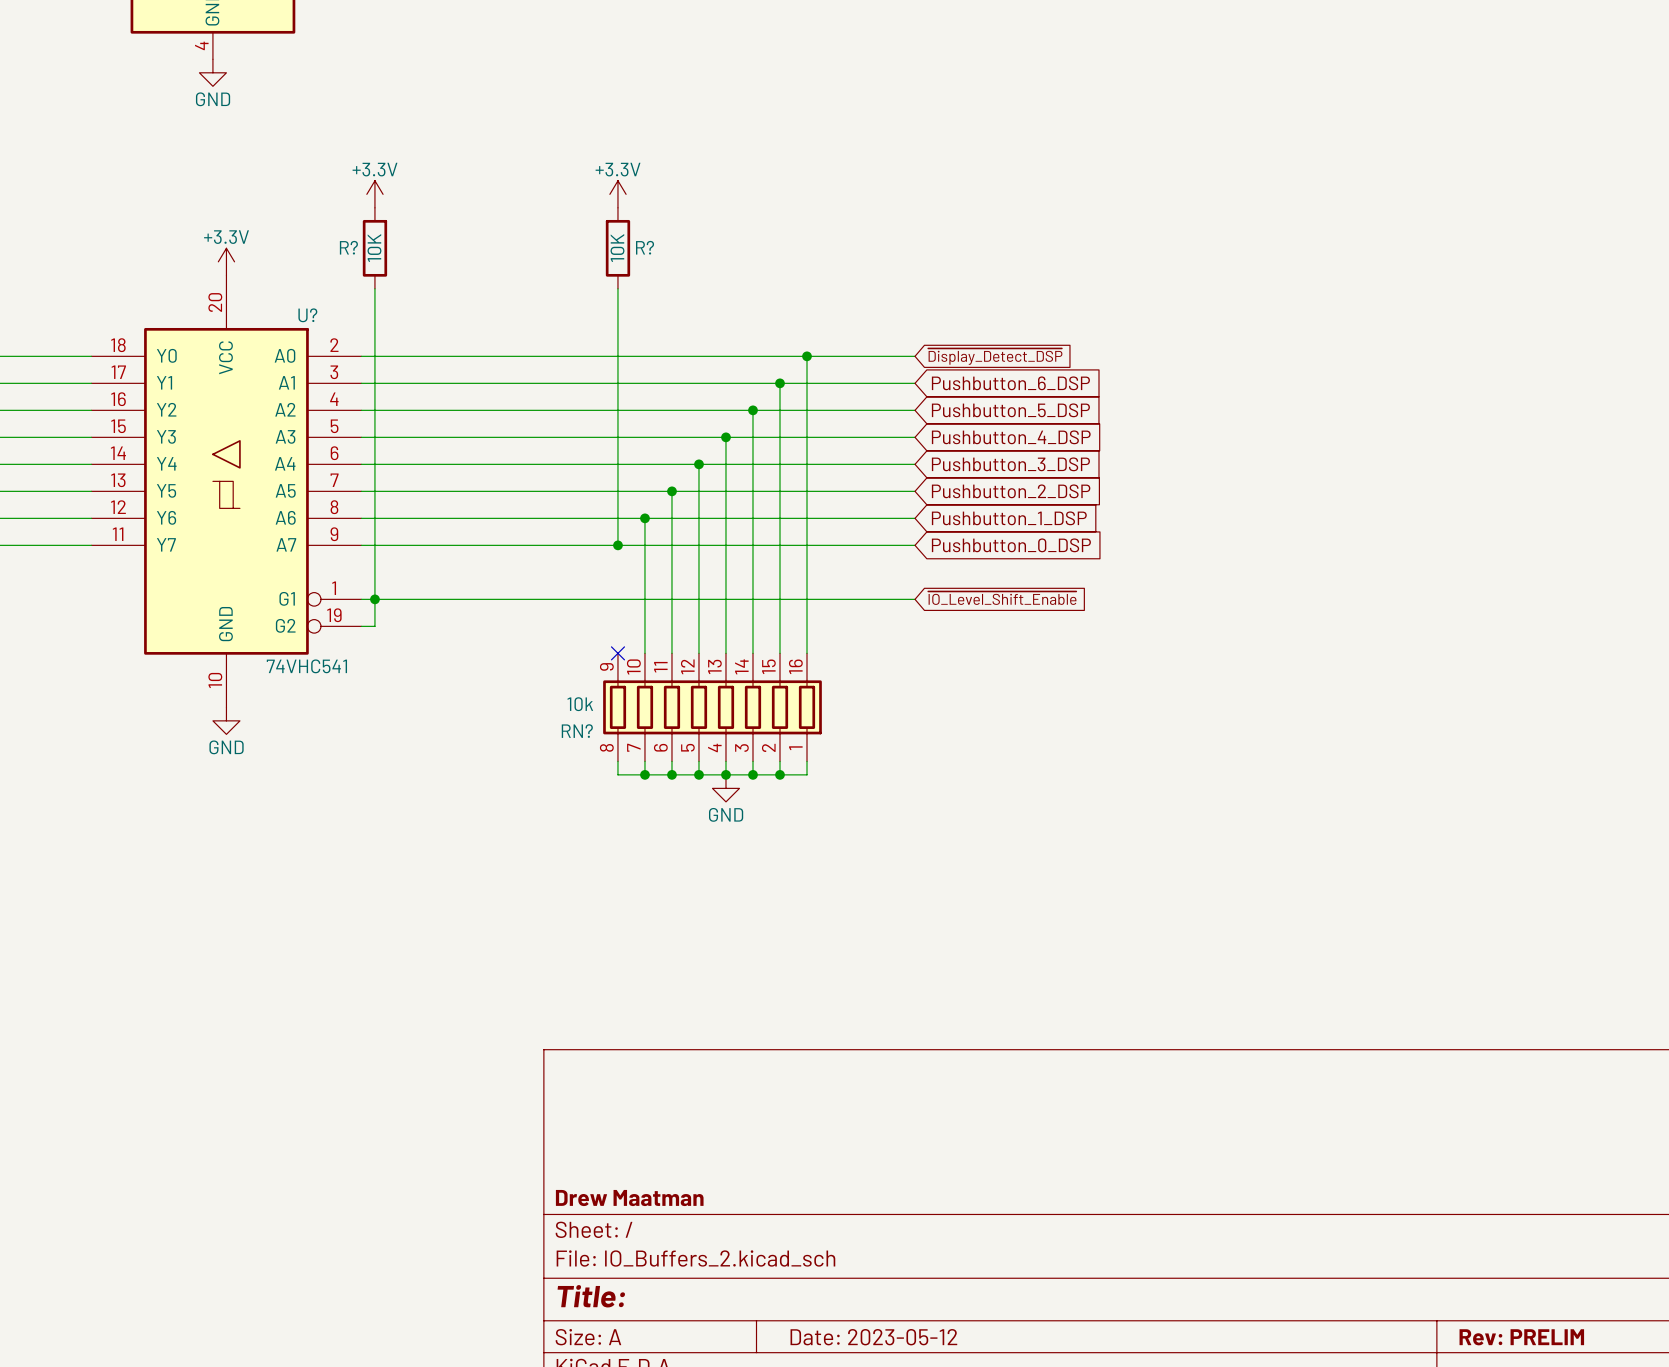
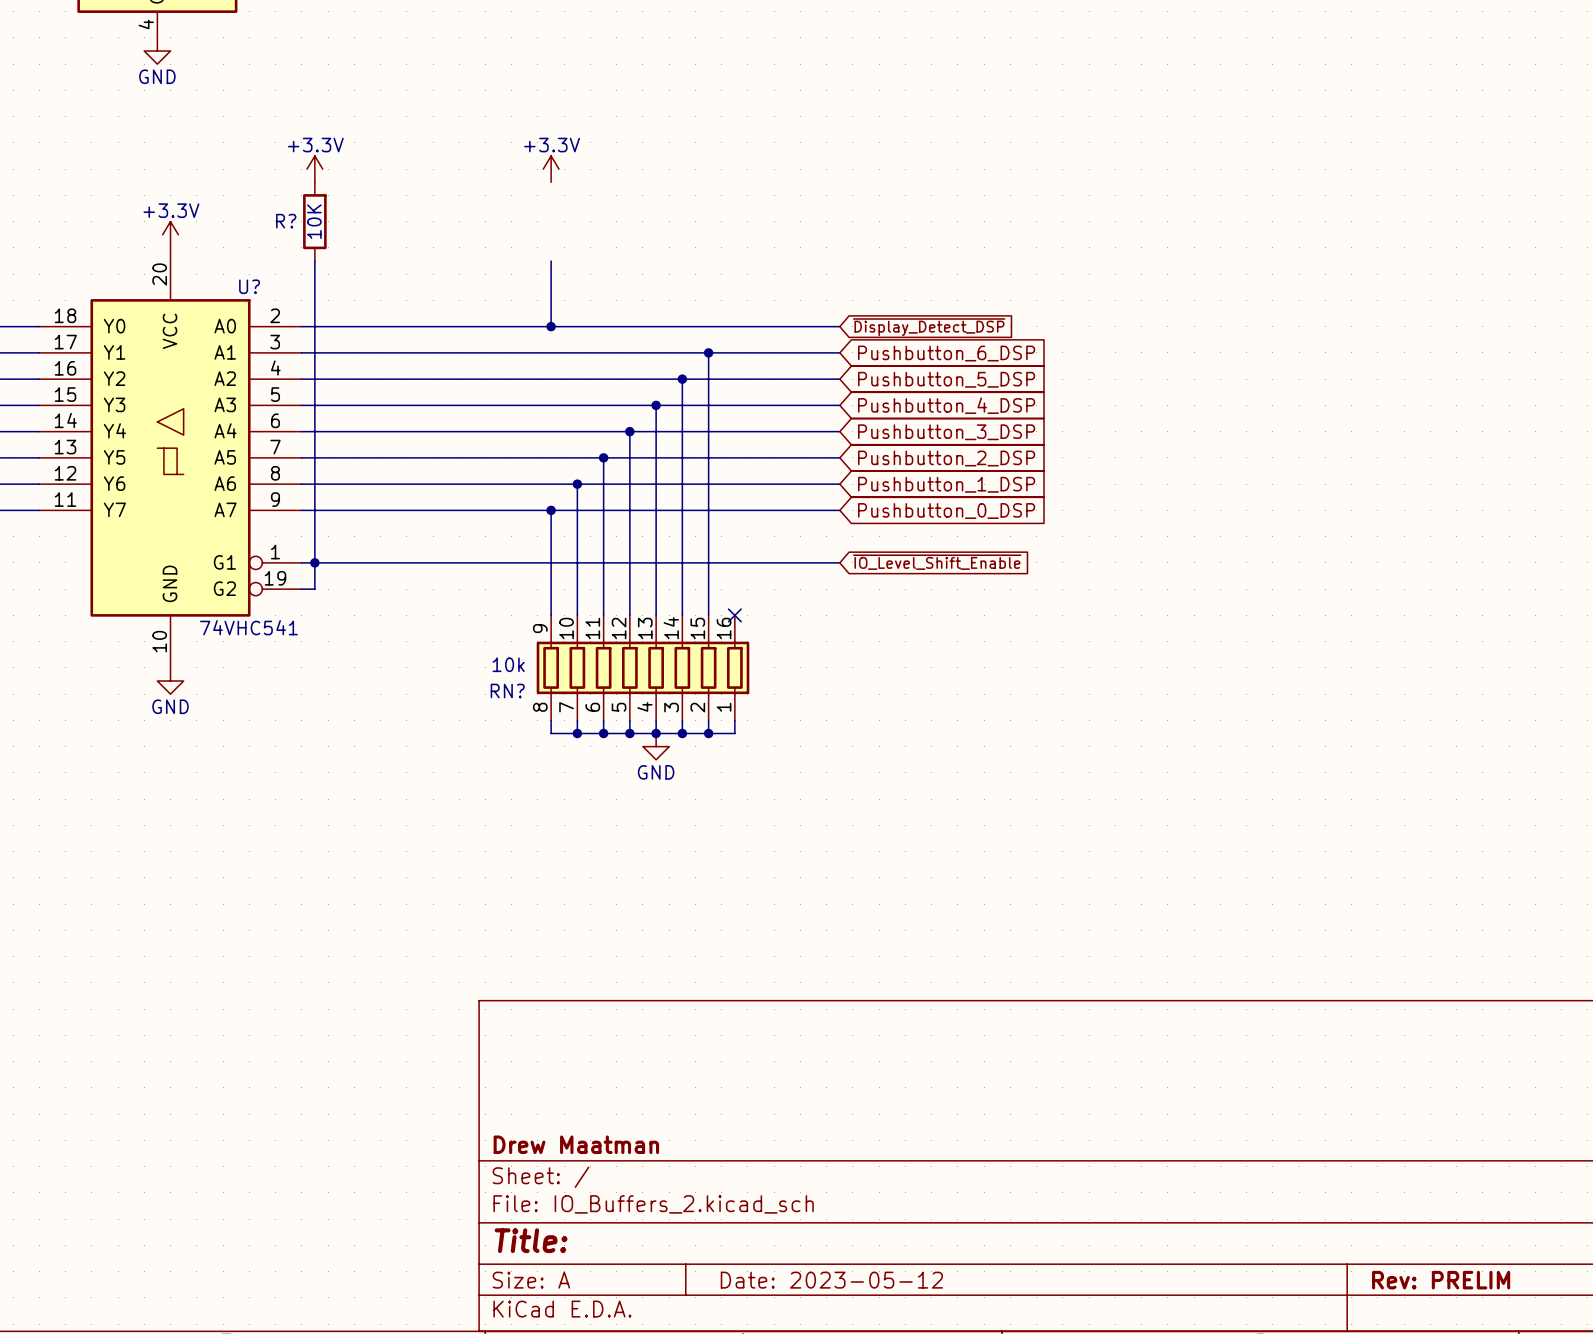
R?: 10K (617, 248) -> none
wire: (617, 356) (617, 545) -> (551, 615) (551, 510)
junction: none -> (551, 326)
wire: (807, 356) (807, 653) -> none
junction: (807, 356) -> none
no-connect mark: (617, 653) -> none
no-connect mark: none -> (734, 615)

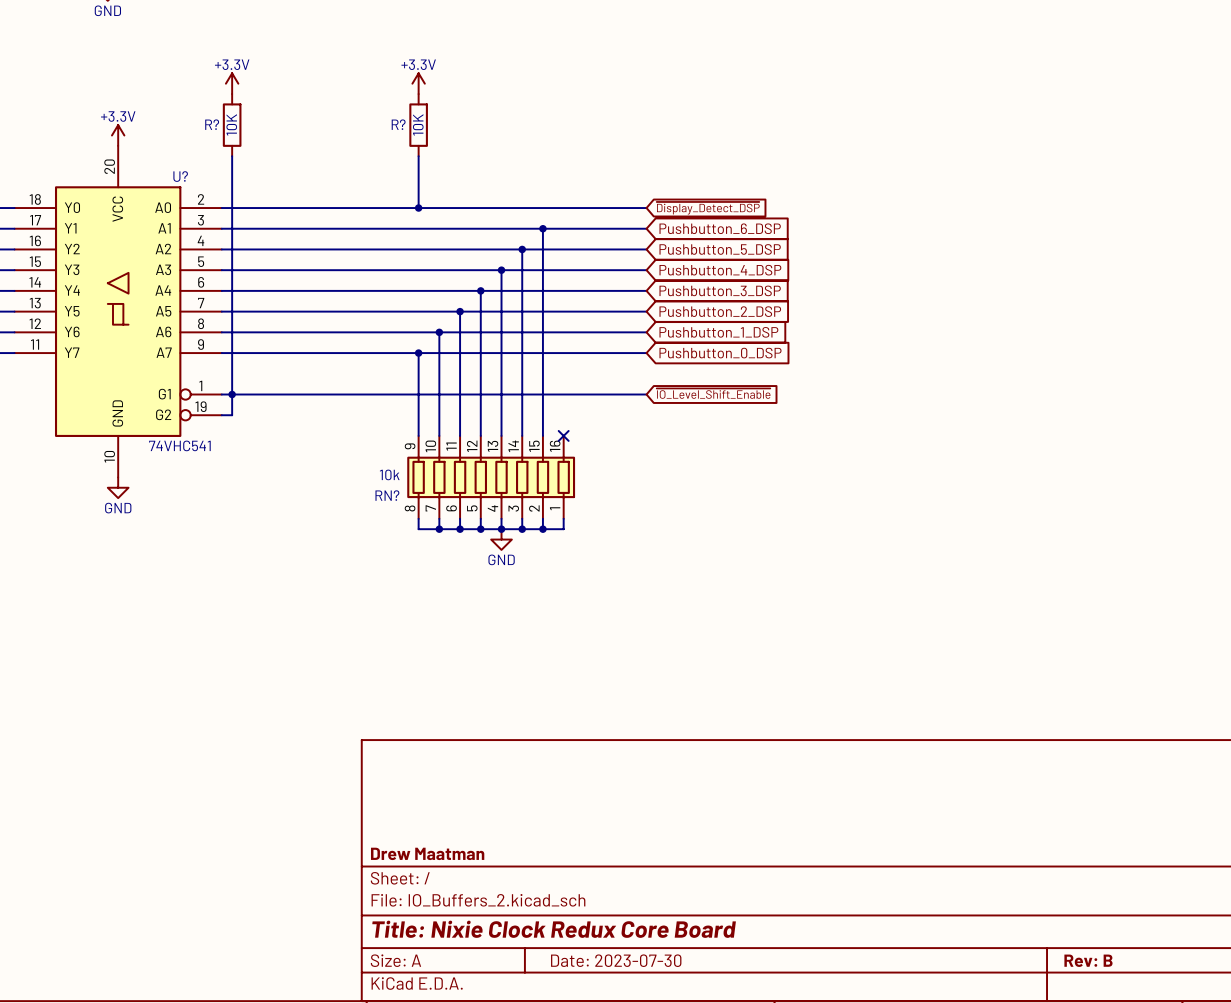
R?: none -> 10K (418, 125)
title block: Title: (531, 1240) -> Title: Nixie Clock Redux Core Board (554, 929)
title block: Date: 2023-05-12 (831, 1280) -> Date: 2023-07-30 (616, 960)
title block: Rev: PRELIM (1441, 1280) -> Rev: B (1088, 960)

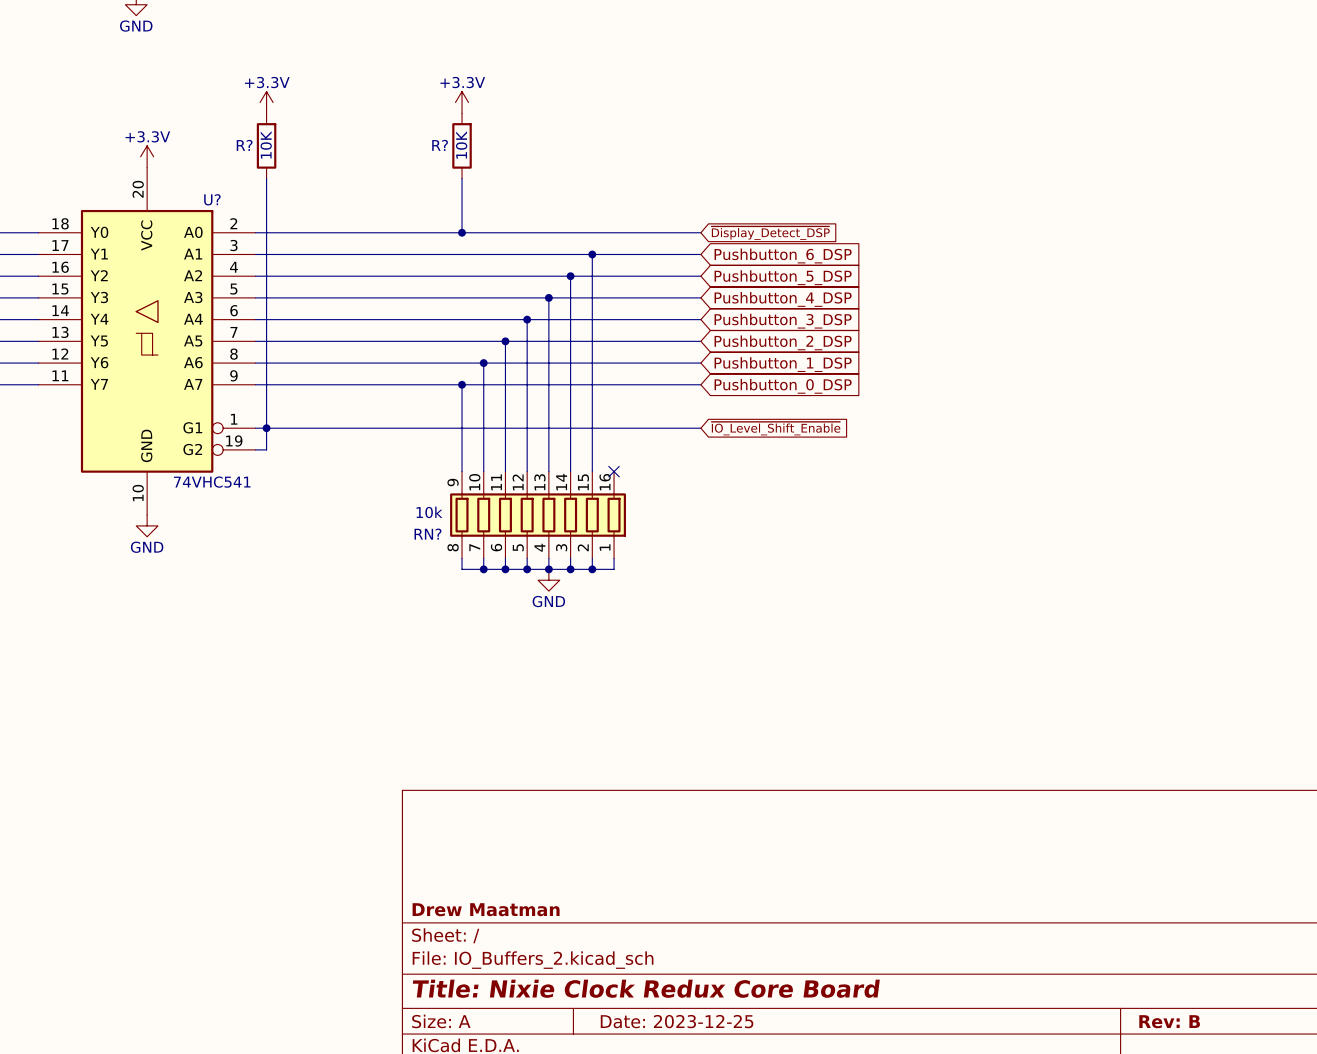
title block: Date: 2023-07-30 (616, 960) -> Date: 2023-12-25 (677, 1021)

